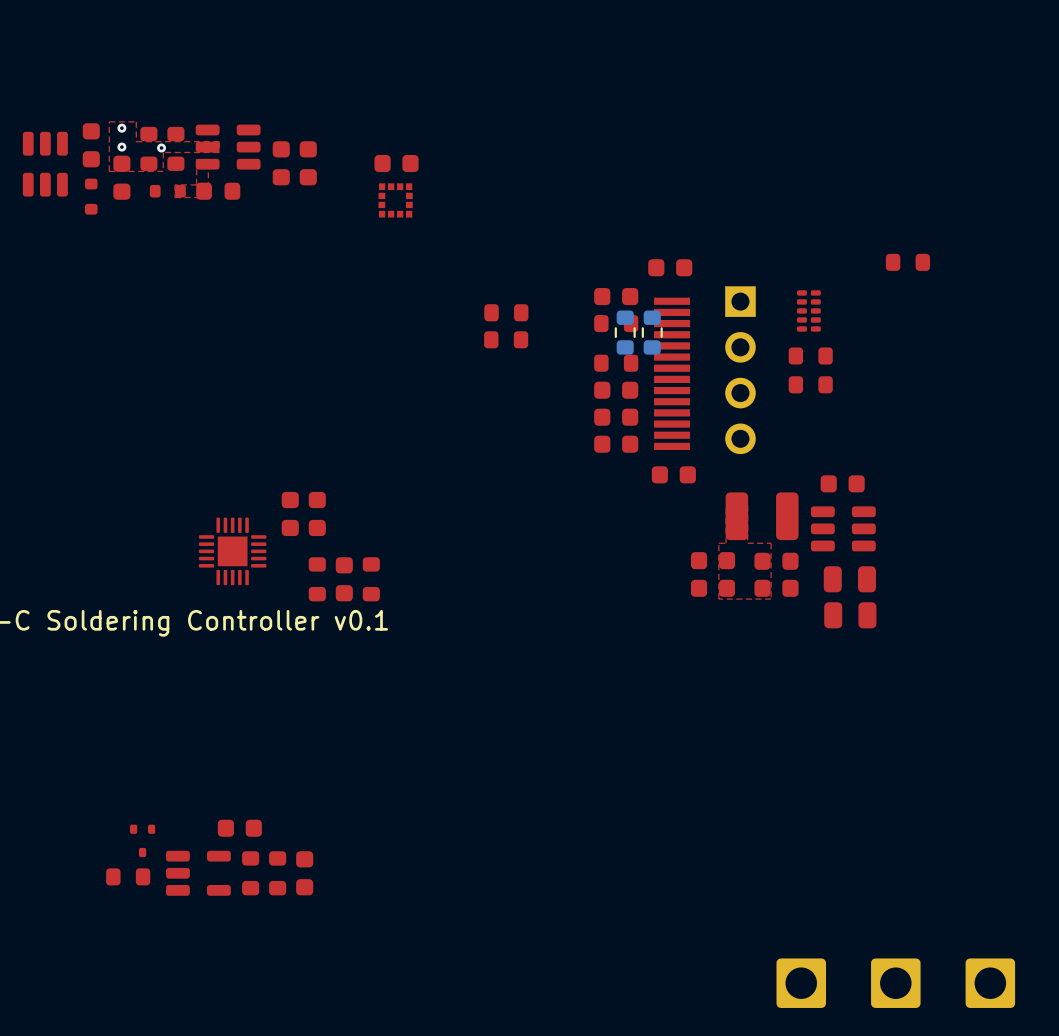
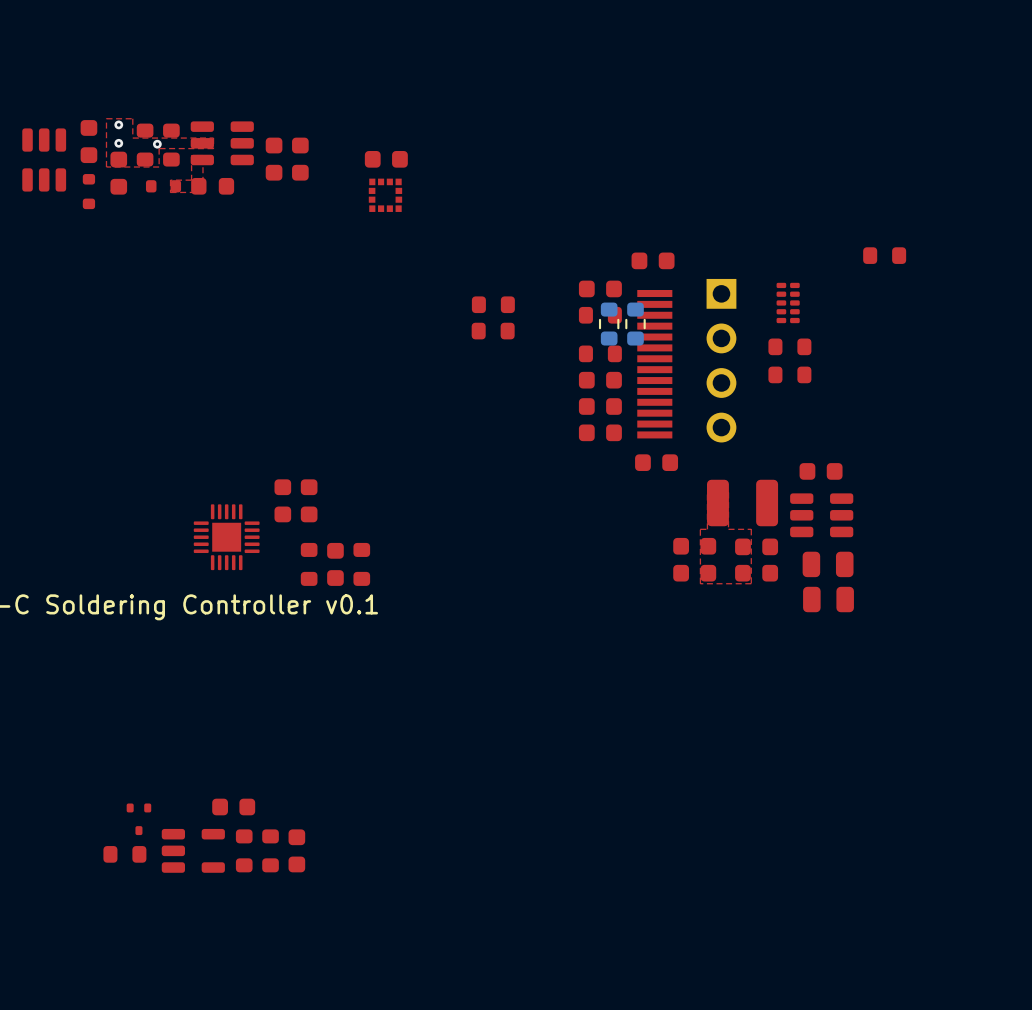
part: (801, 983) -> none
part: (895, 983) -> none
part: (990, 983) -> none

